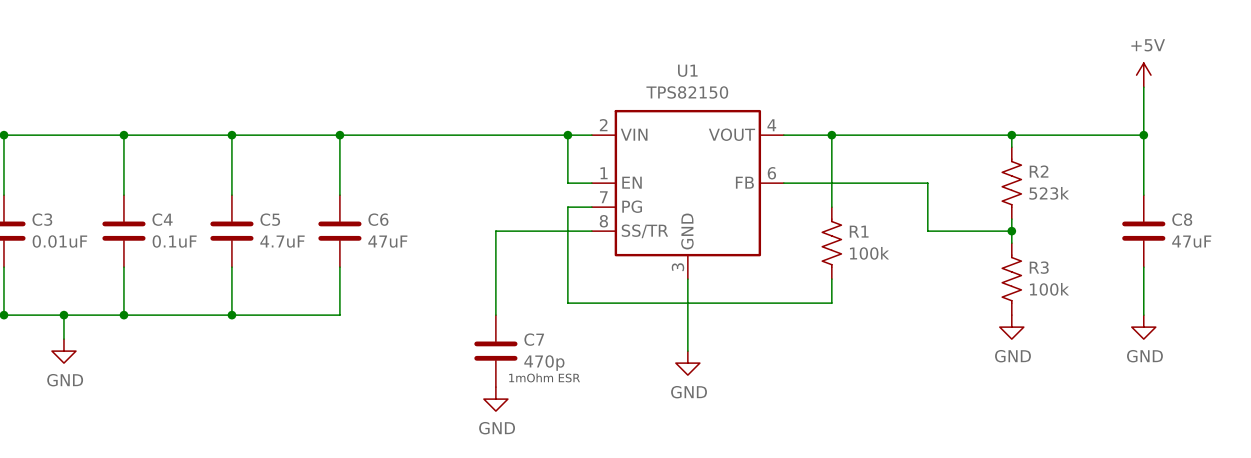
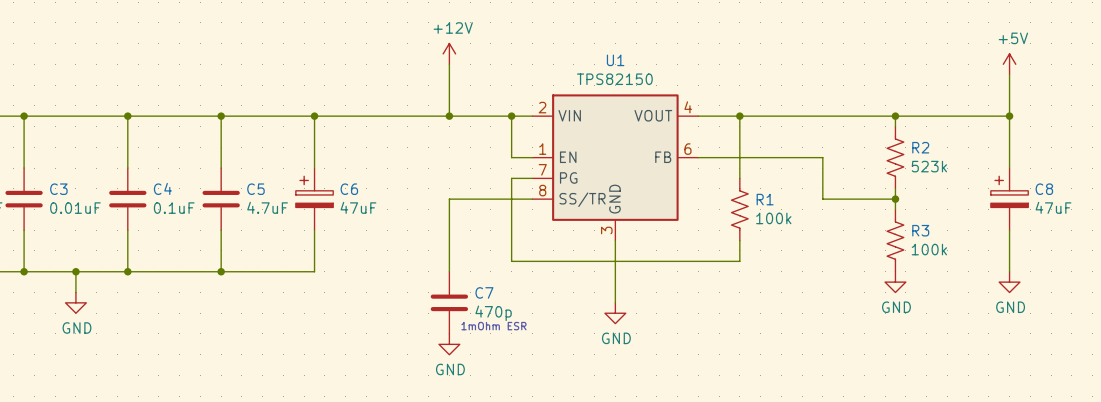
power symbol: none -> +12V (449, 53)
wire: none -> (449, 64) (449, 116)
junction: none -> (449, 116)
C6 symbol: [318, 195, 362, 268] -> [295, 168, 334, 231]
C8 symbol: [1122, 195, 1166, 268] -> [990, 168, 1029, 231]

